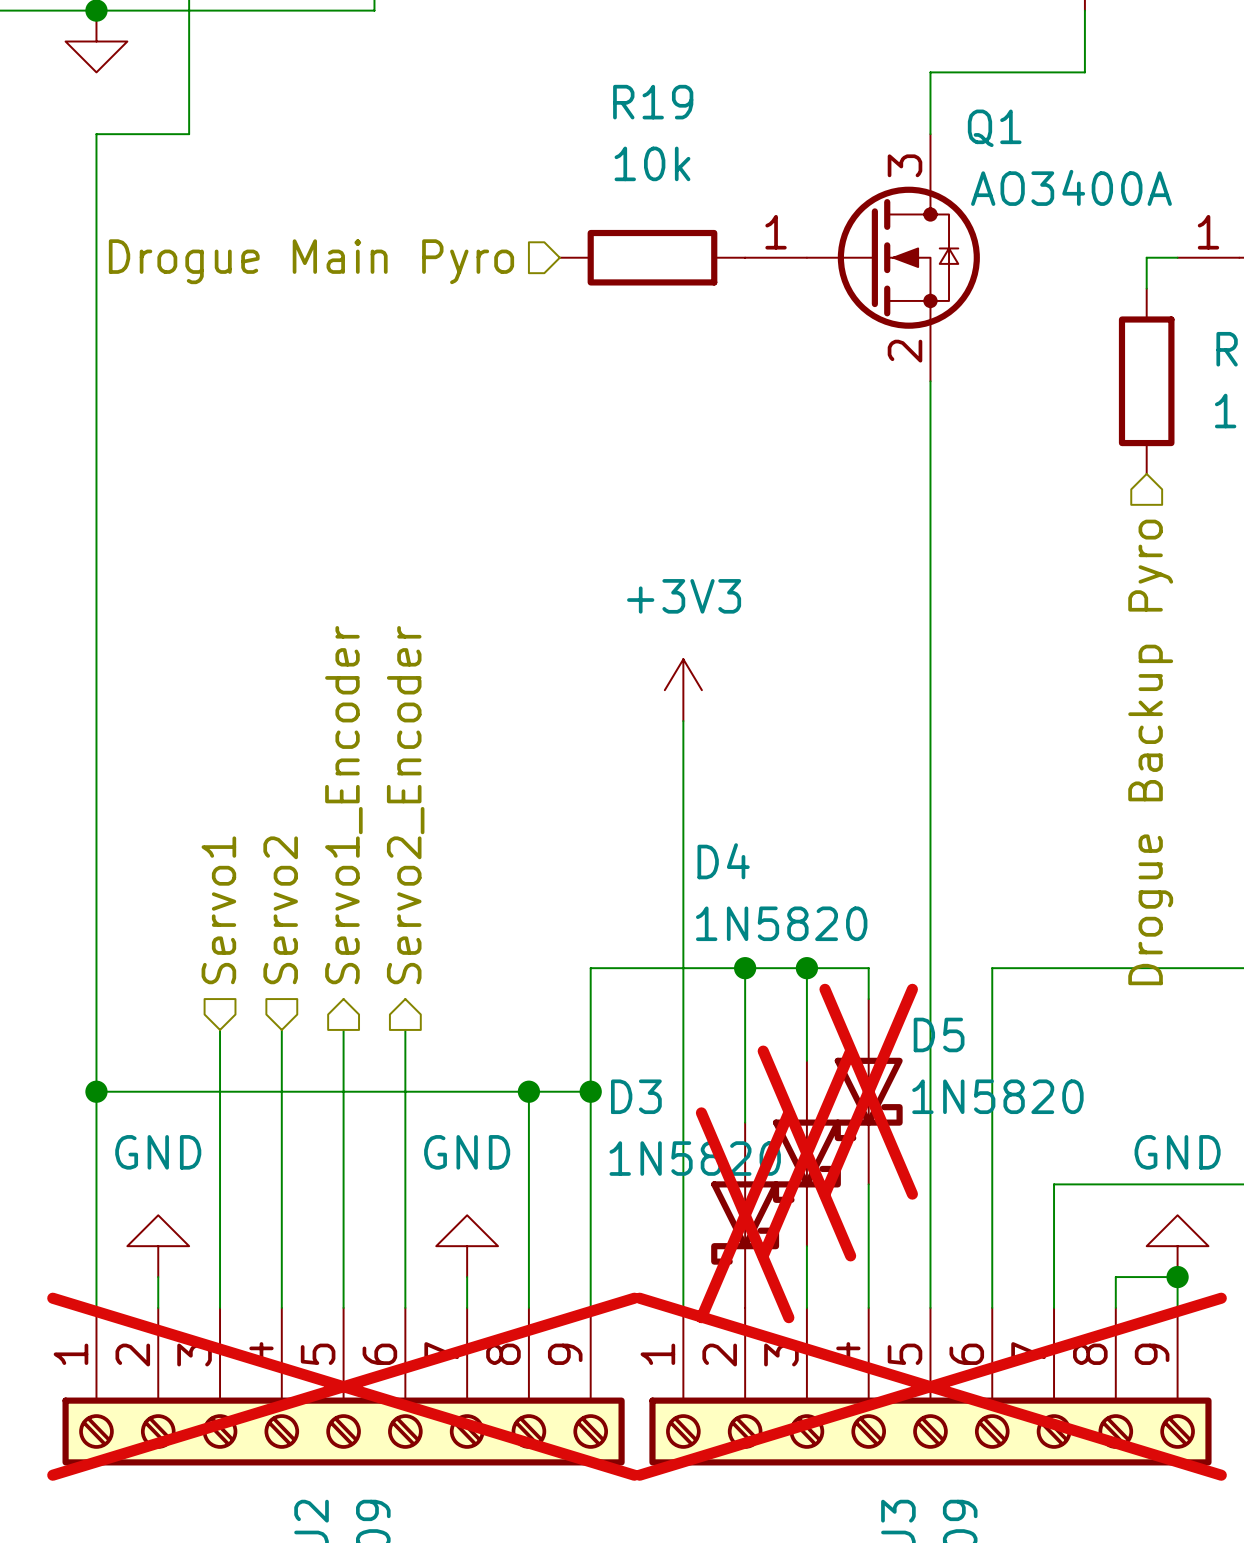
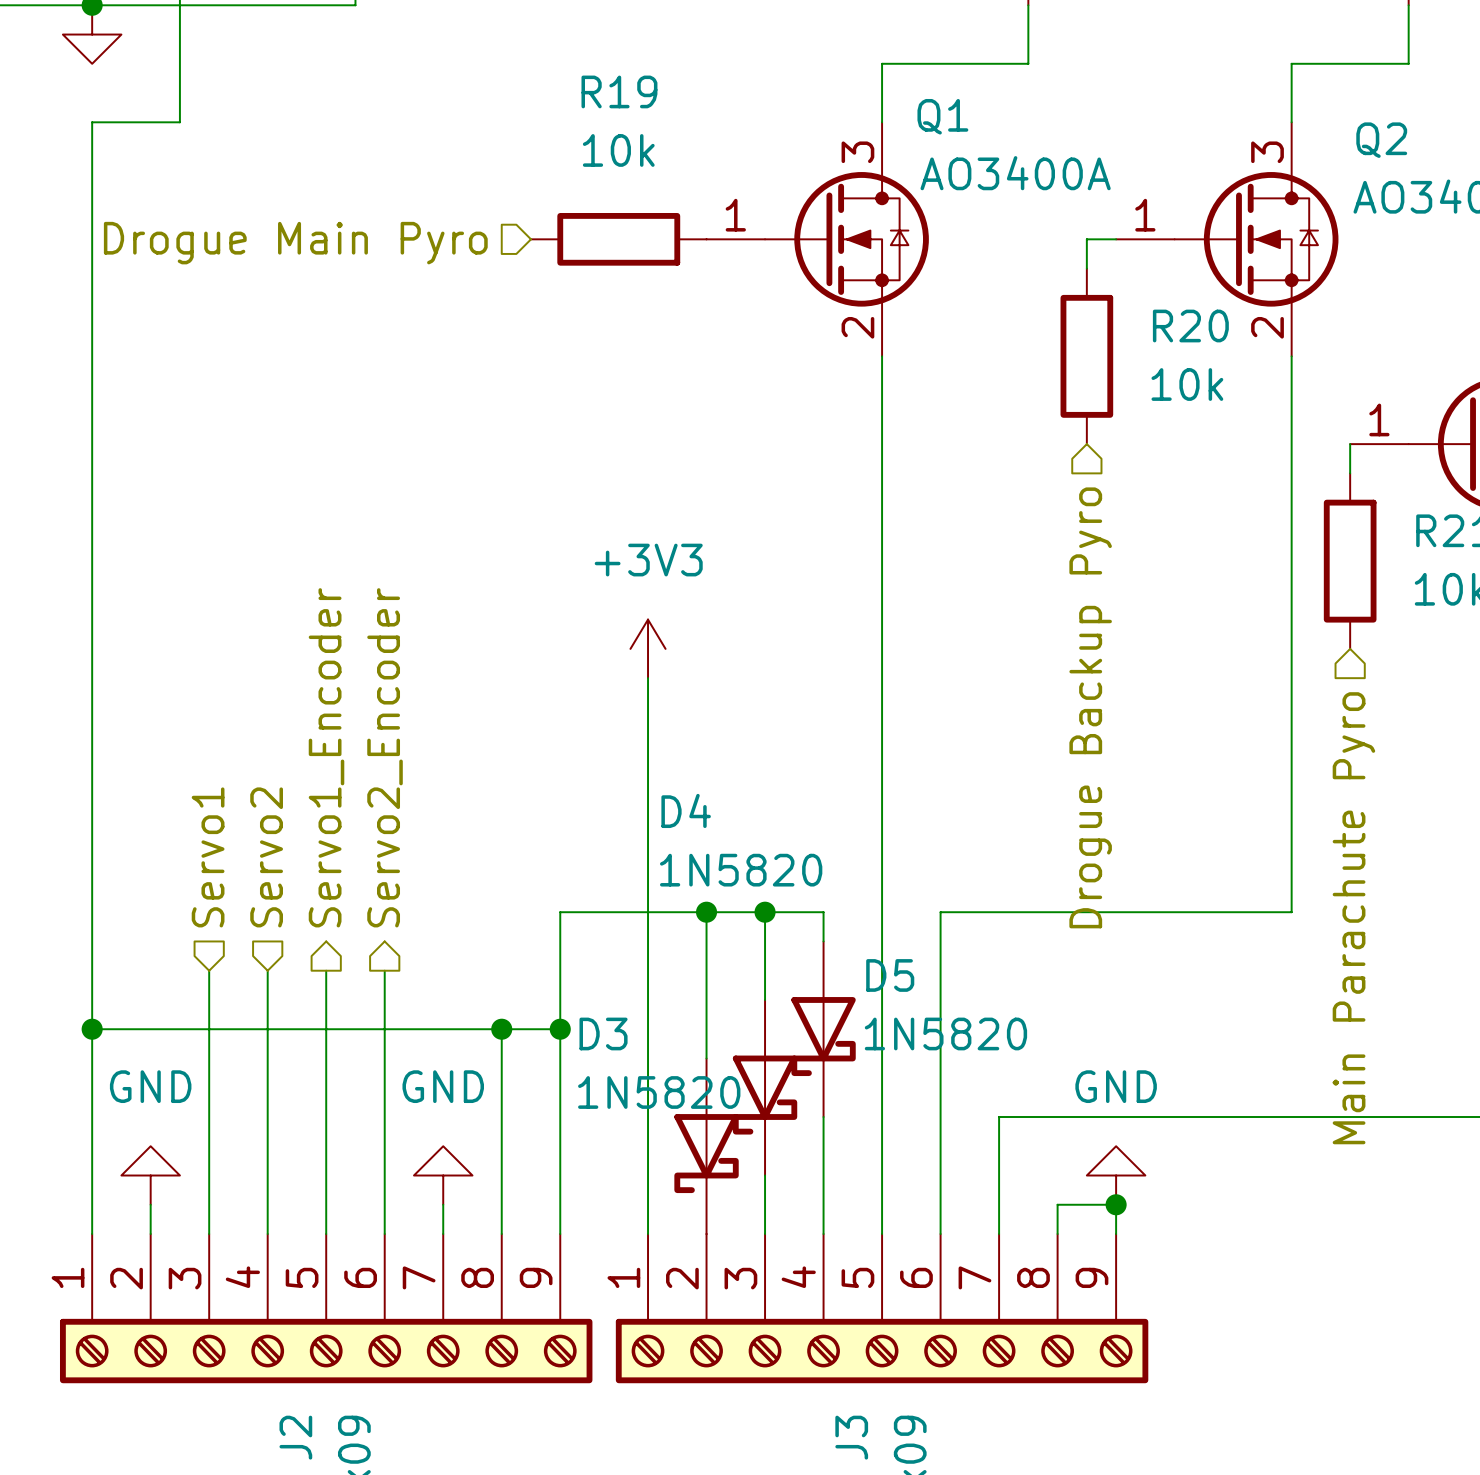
D5 do-not-place cross: (868, 1091) -> none
D4 do-not-place cross: (806, 1153) -> none
D3 do-not-place cross: (745, 1215) -> none
J2 do-not-place cross: (343, 1386) -> none
J3 do-not-place cross: (930, 1386) -> none

